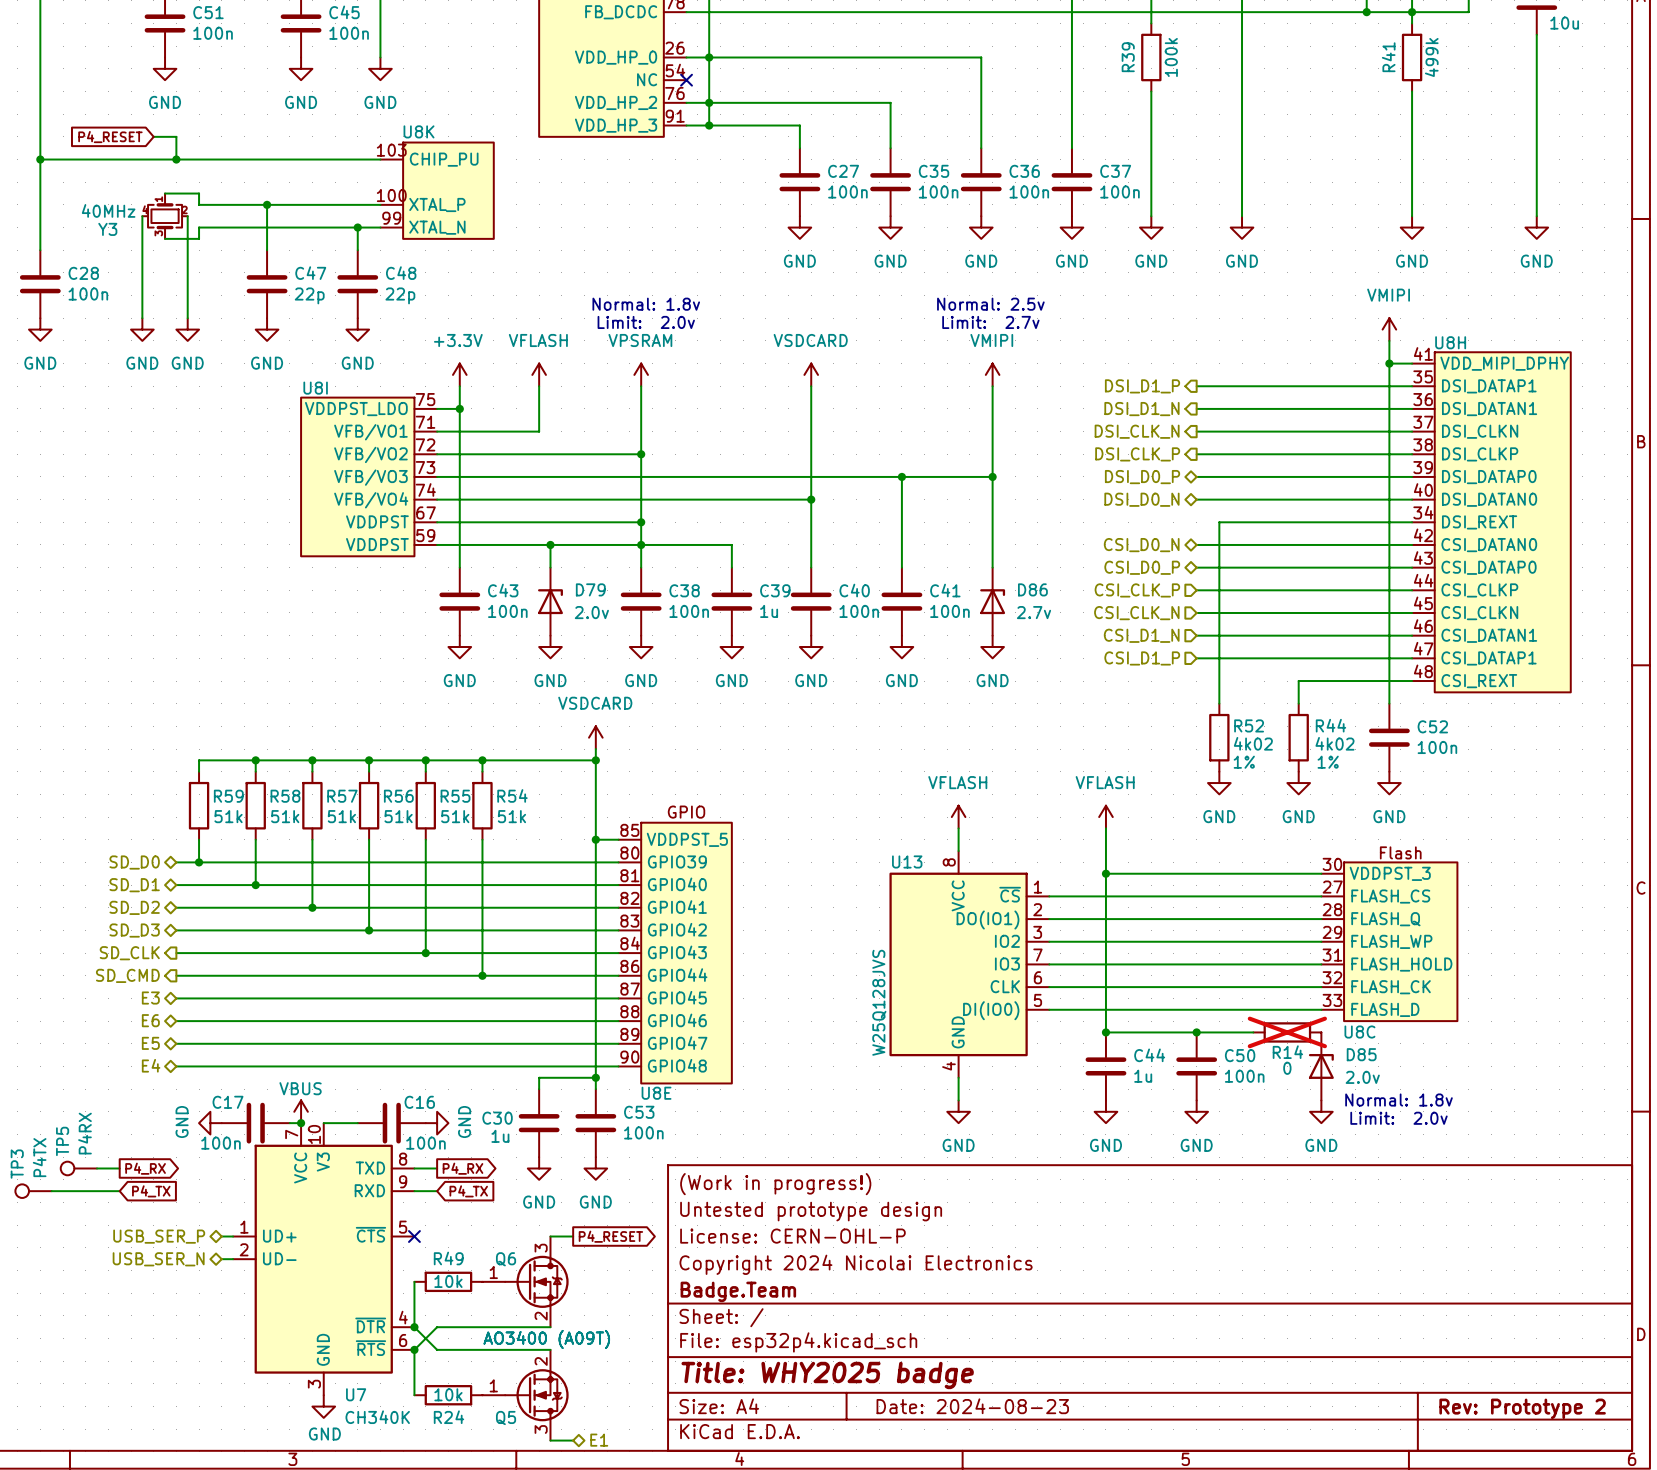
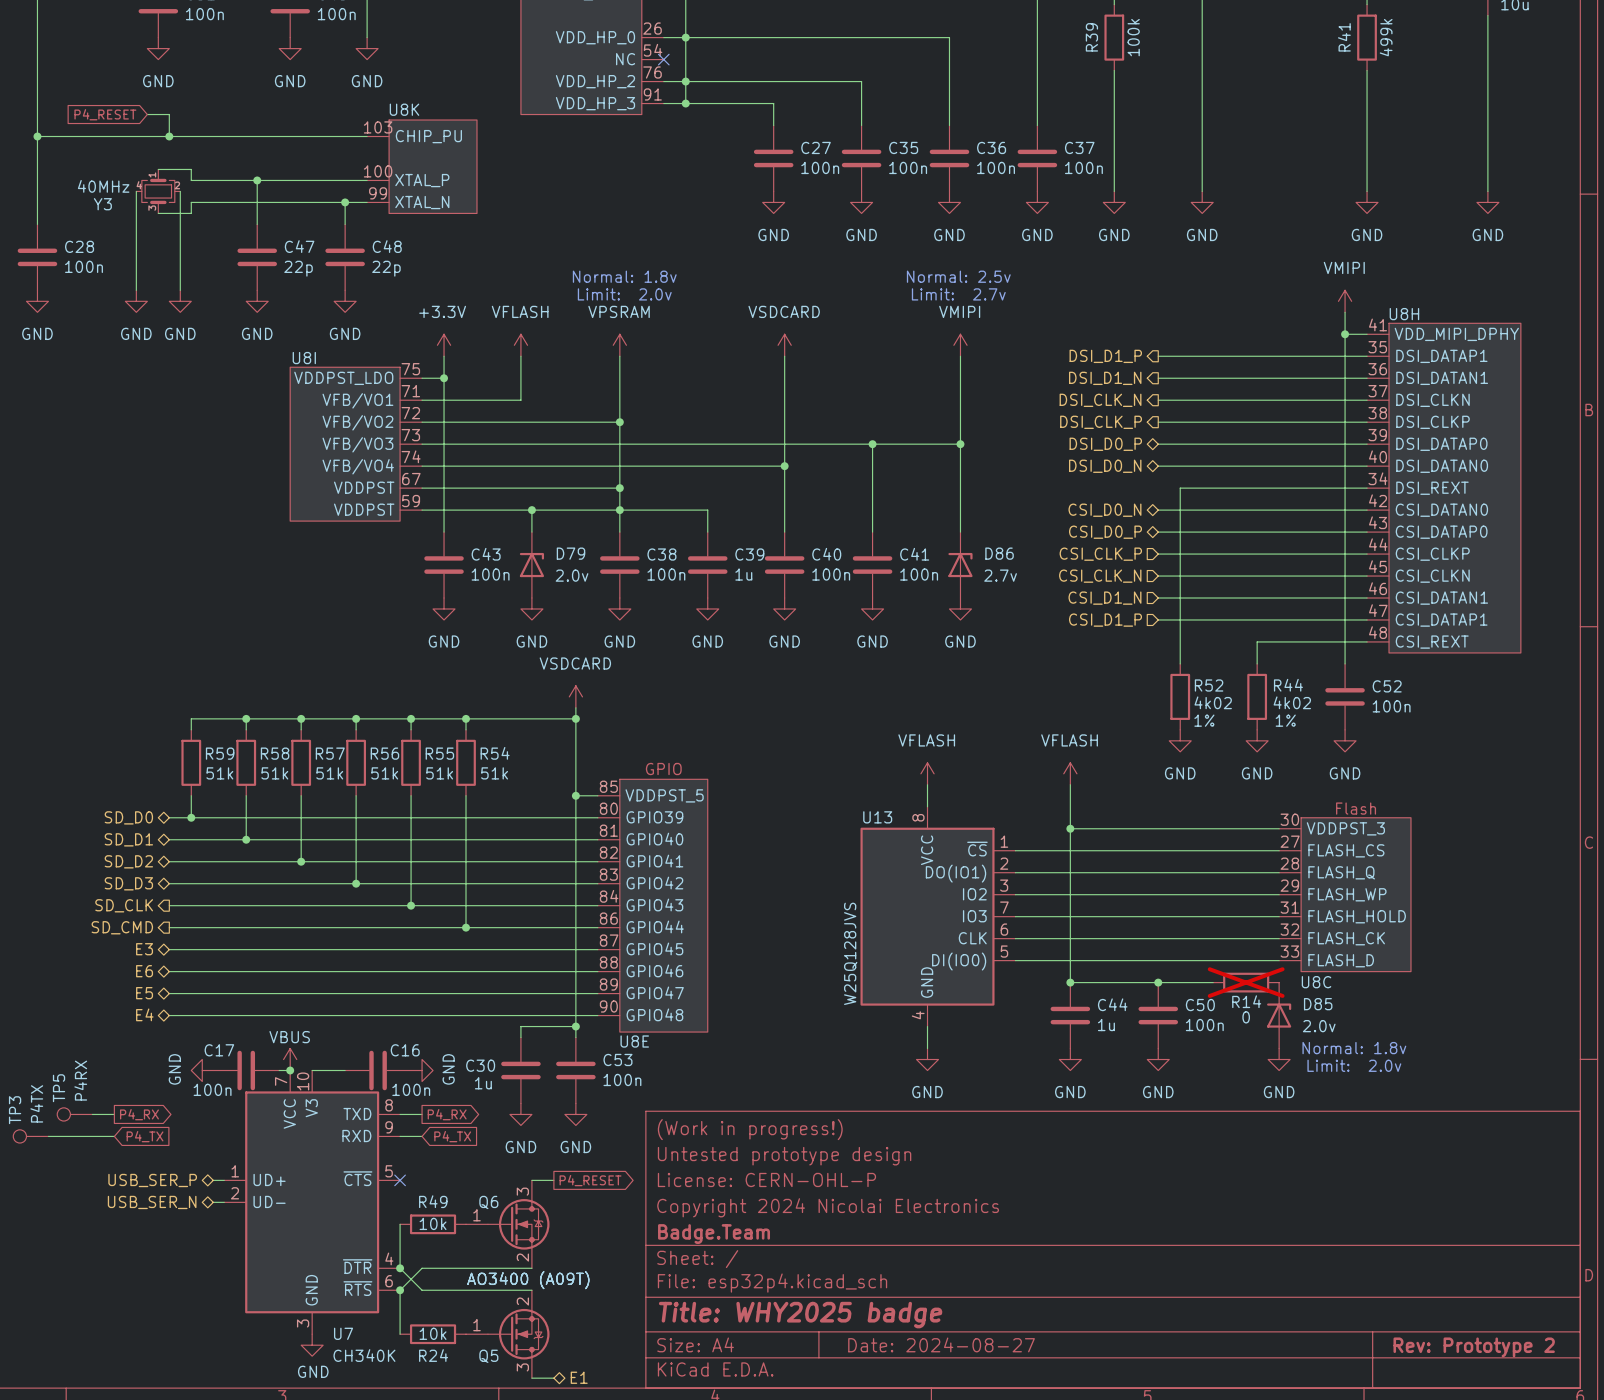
title block: Date: 2024-08-23 (972, 1406) -> Date: 2024-08-27 (941, 1344)

